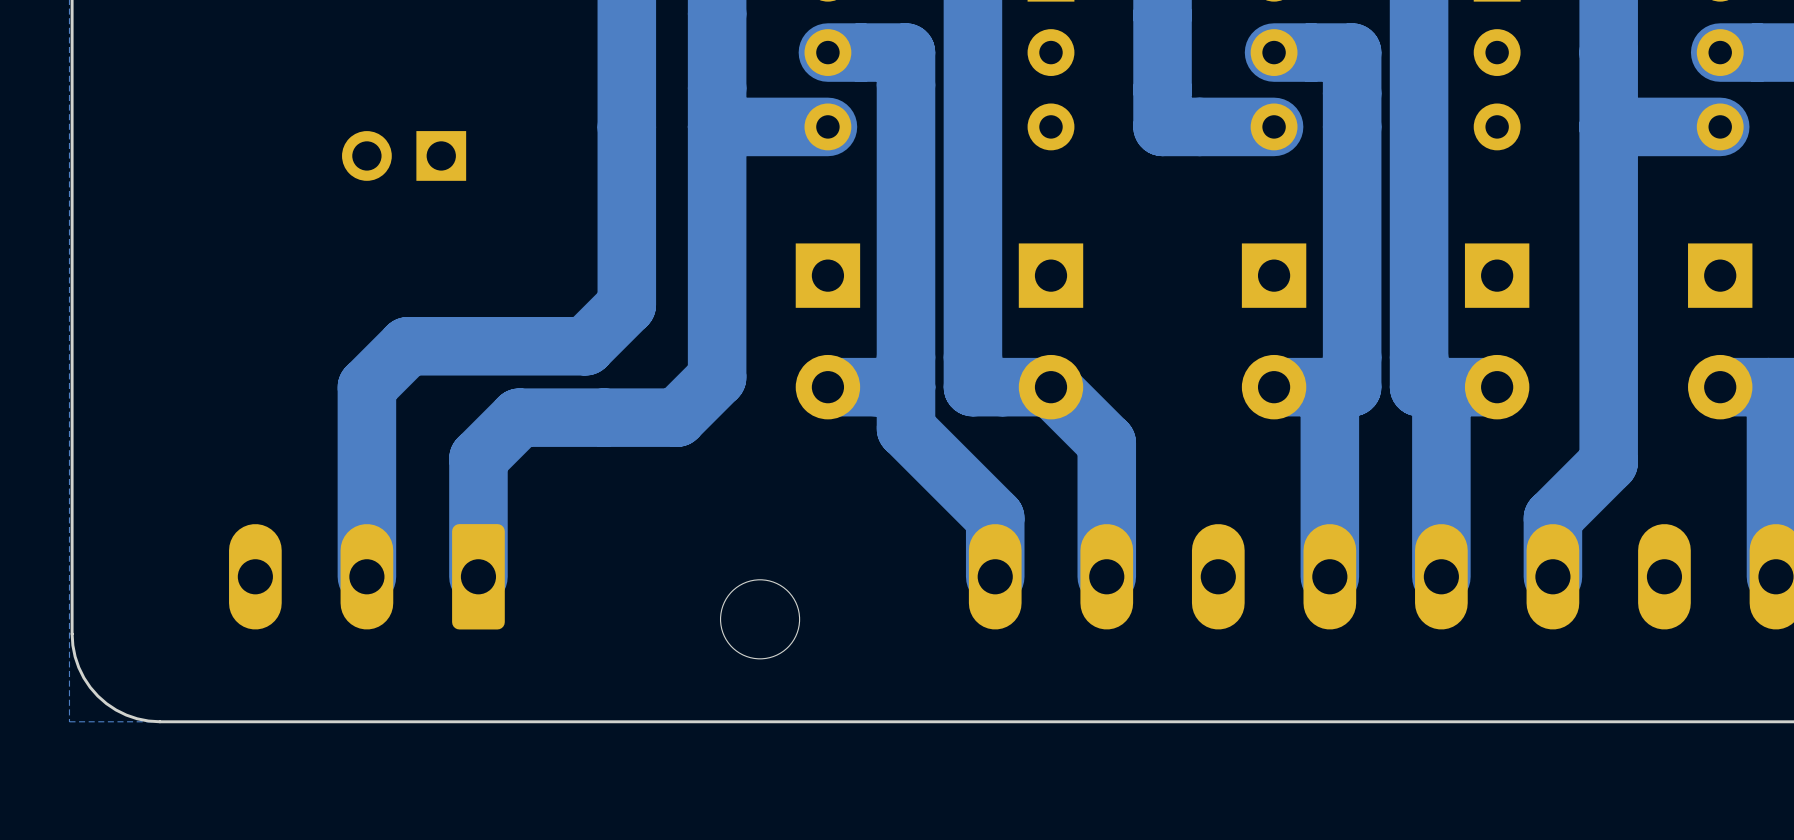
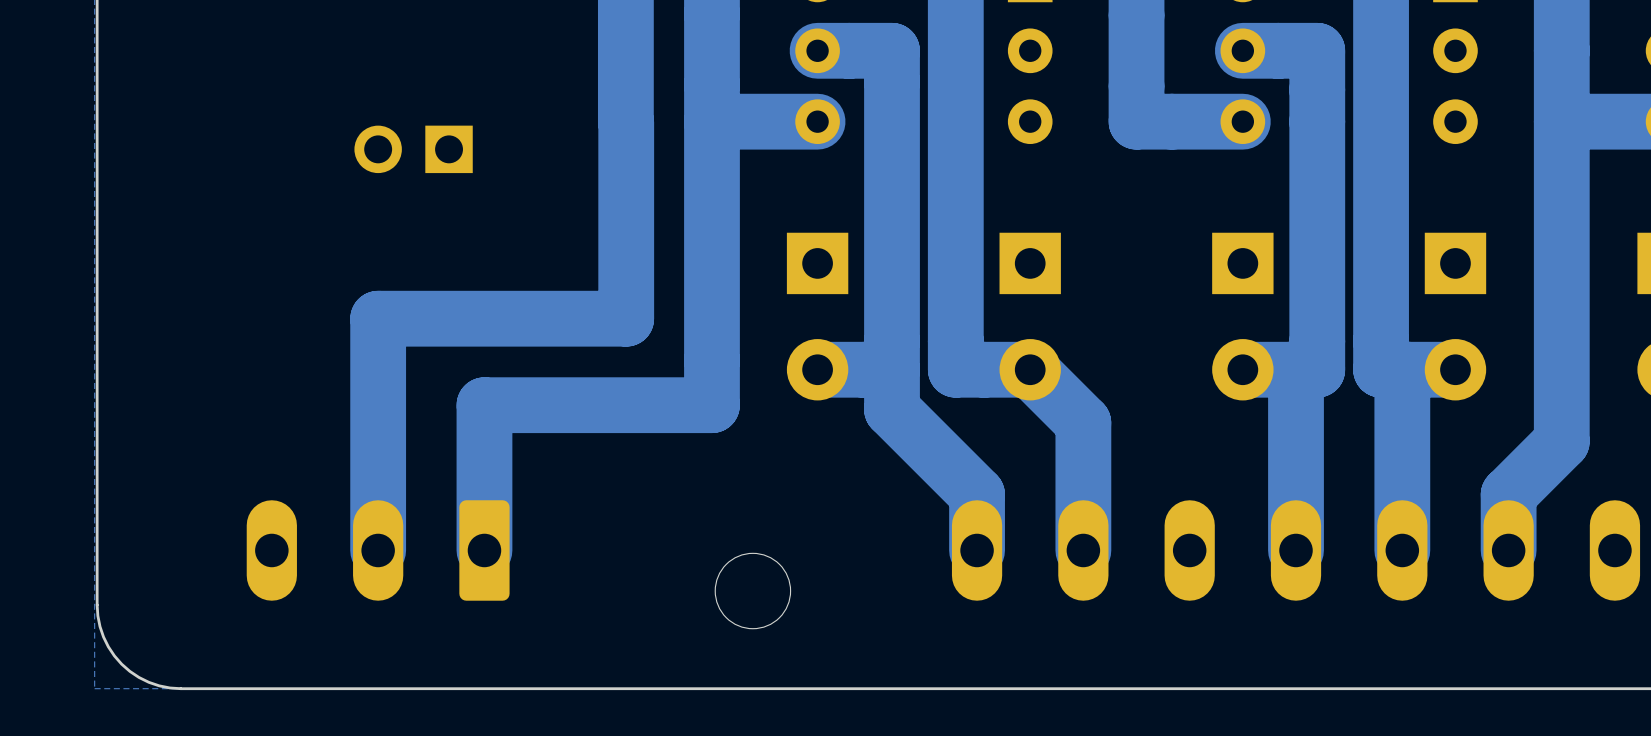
track: (626, 127) (626, 304) (585, 346) (407, 346) (366, 387) -> (626, 122) (626, 318) (378, 318) (378, 369)
track: (717, 377) (676, 417) (519, 417) (478, 458) -> (711, 360) (711, 405) (484, 405) (484, 437)

